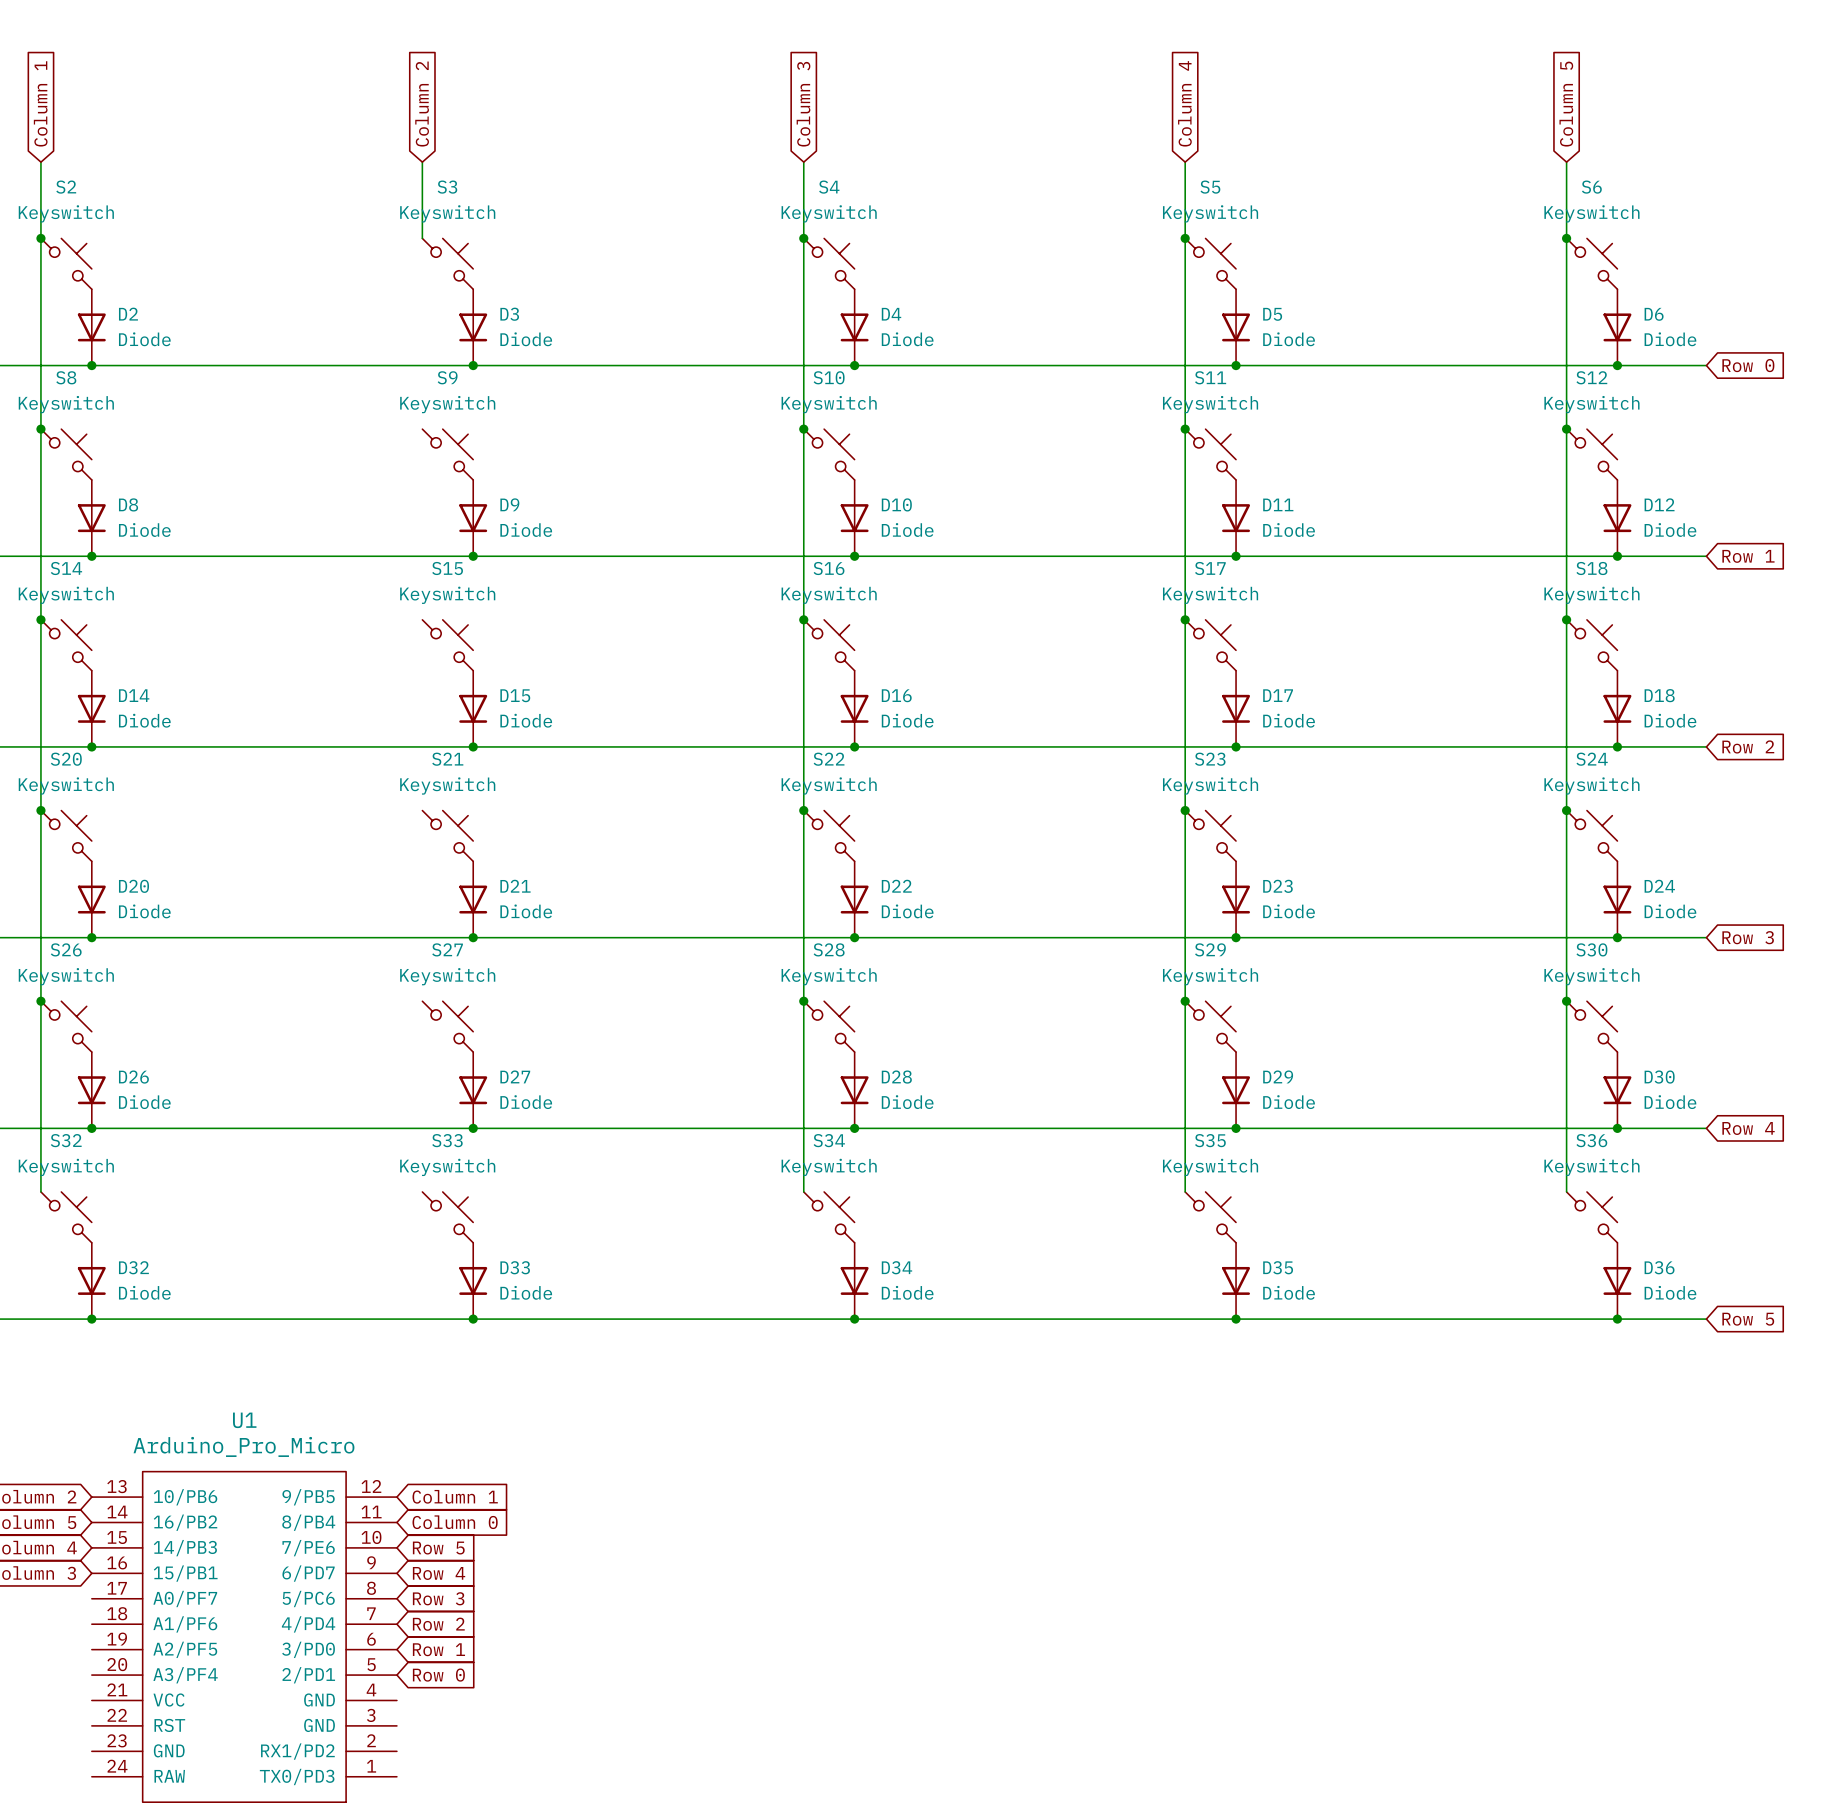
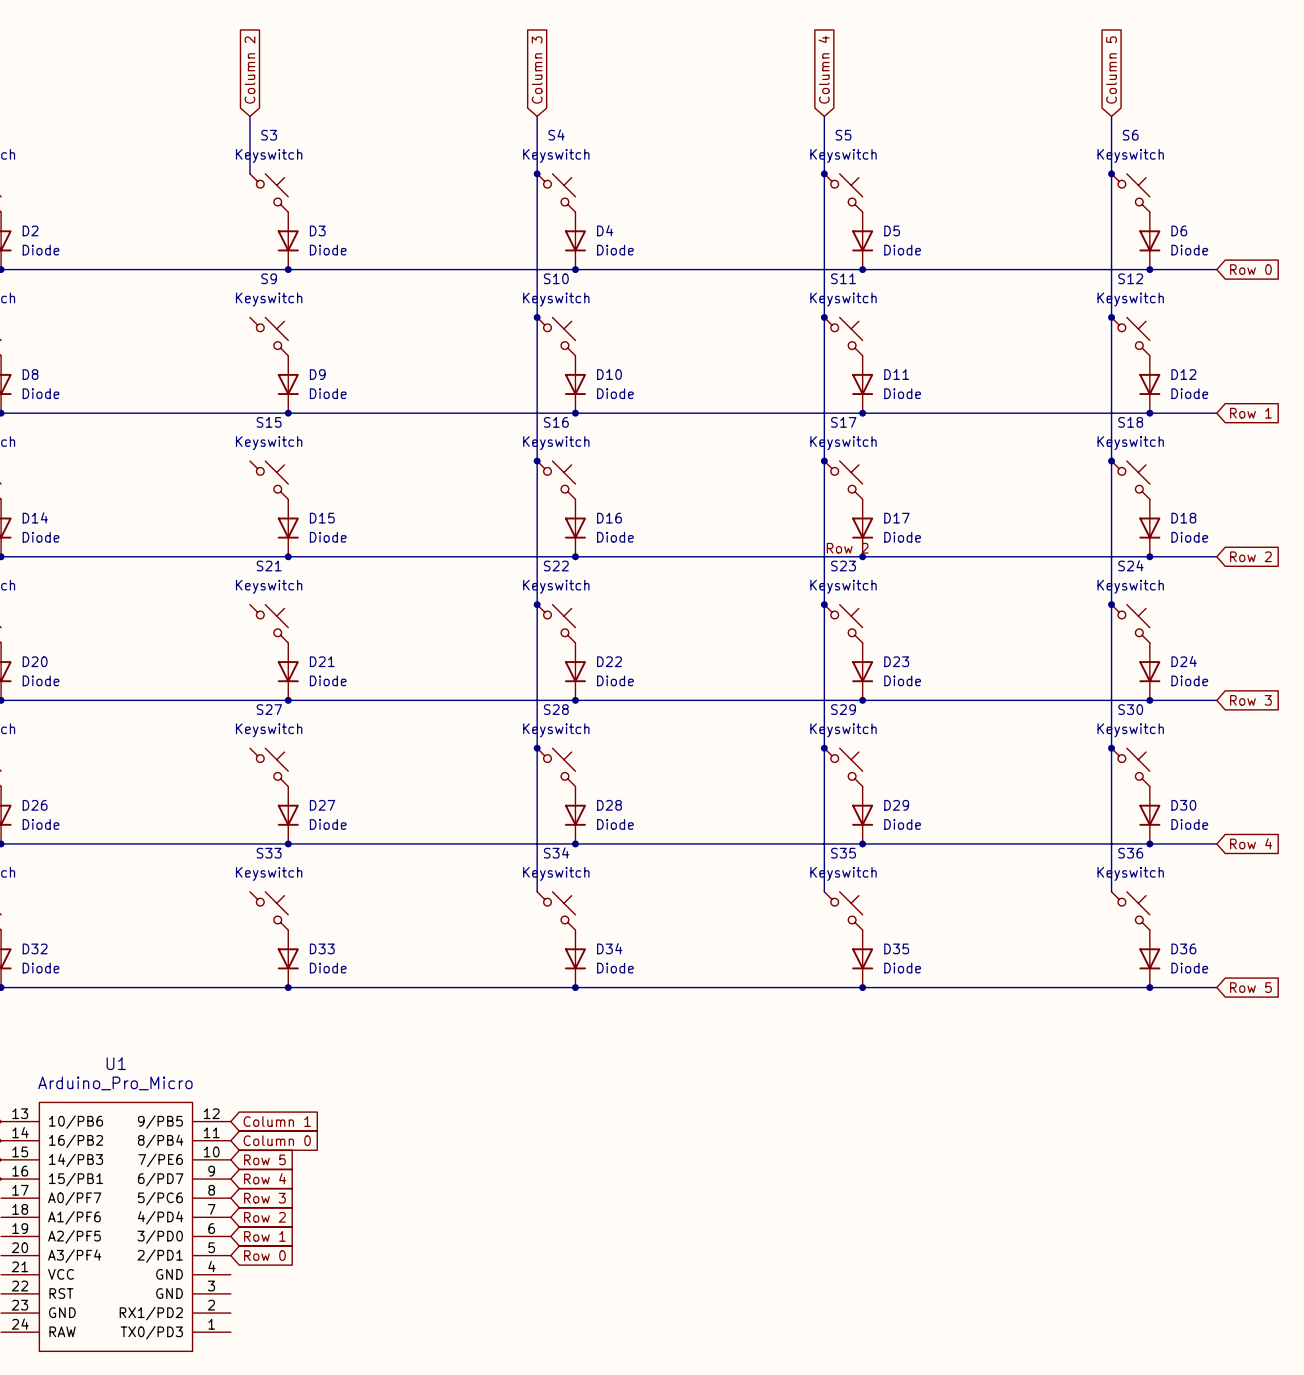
label: none -> Row 2 (847, 548)

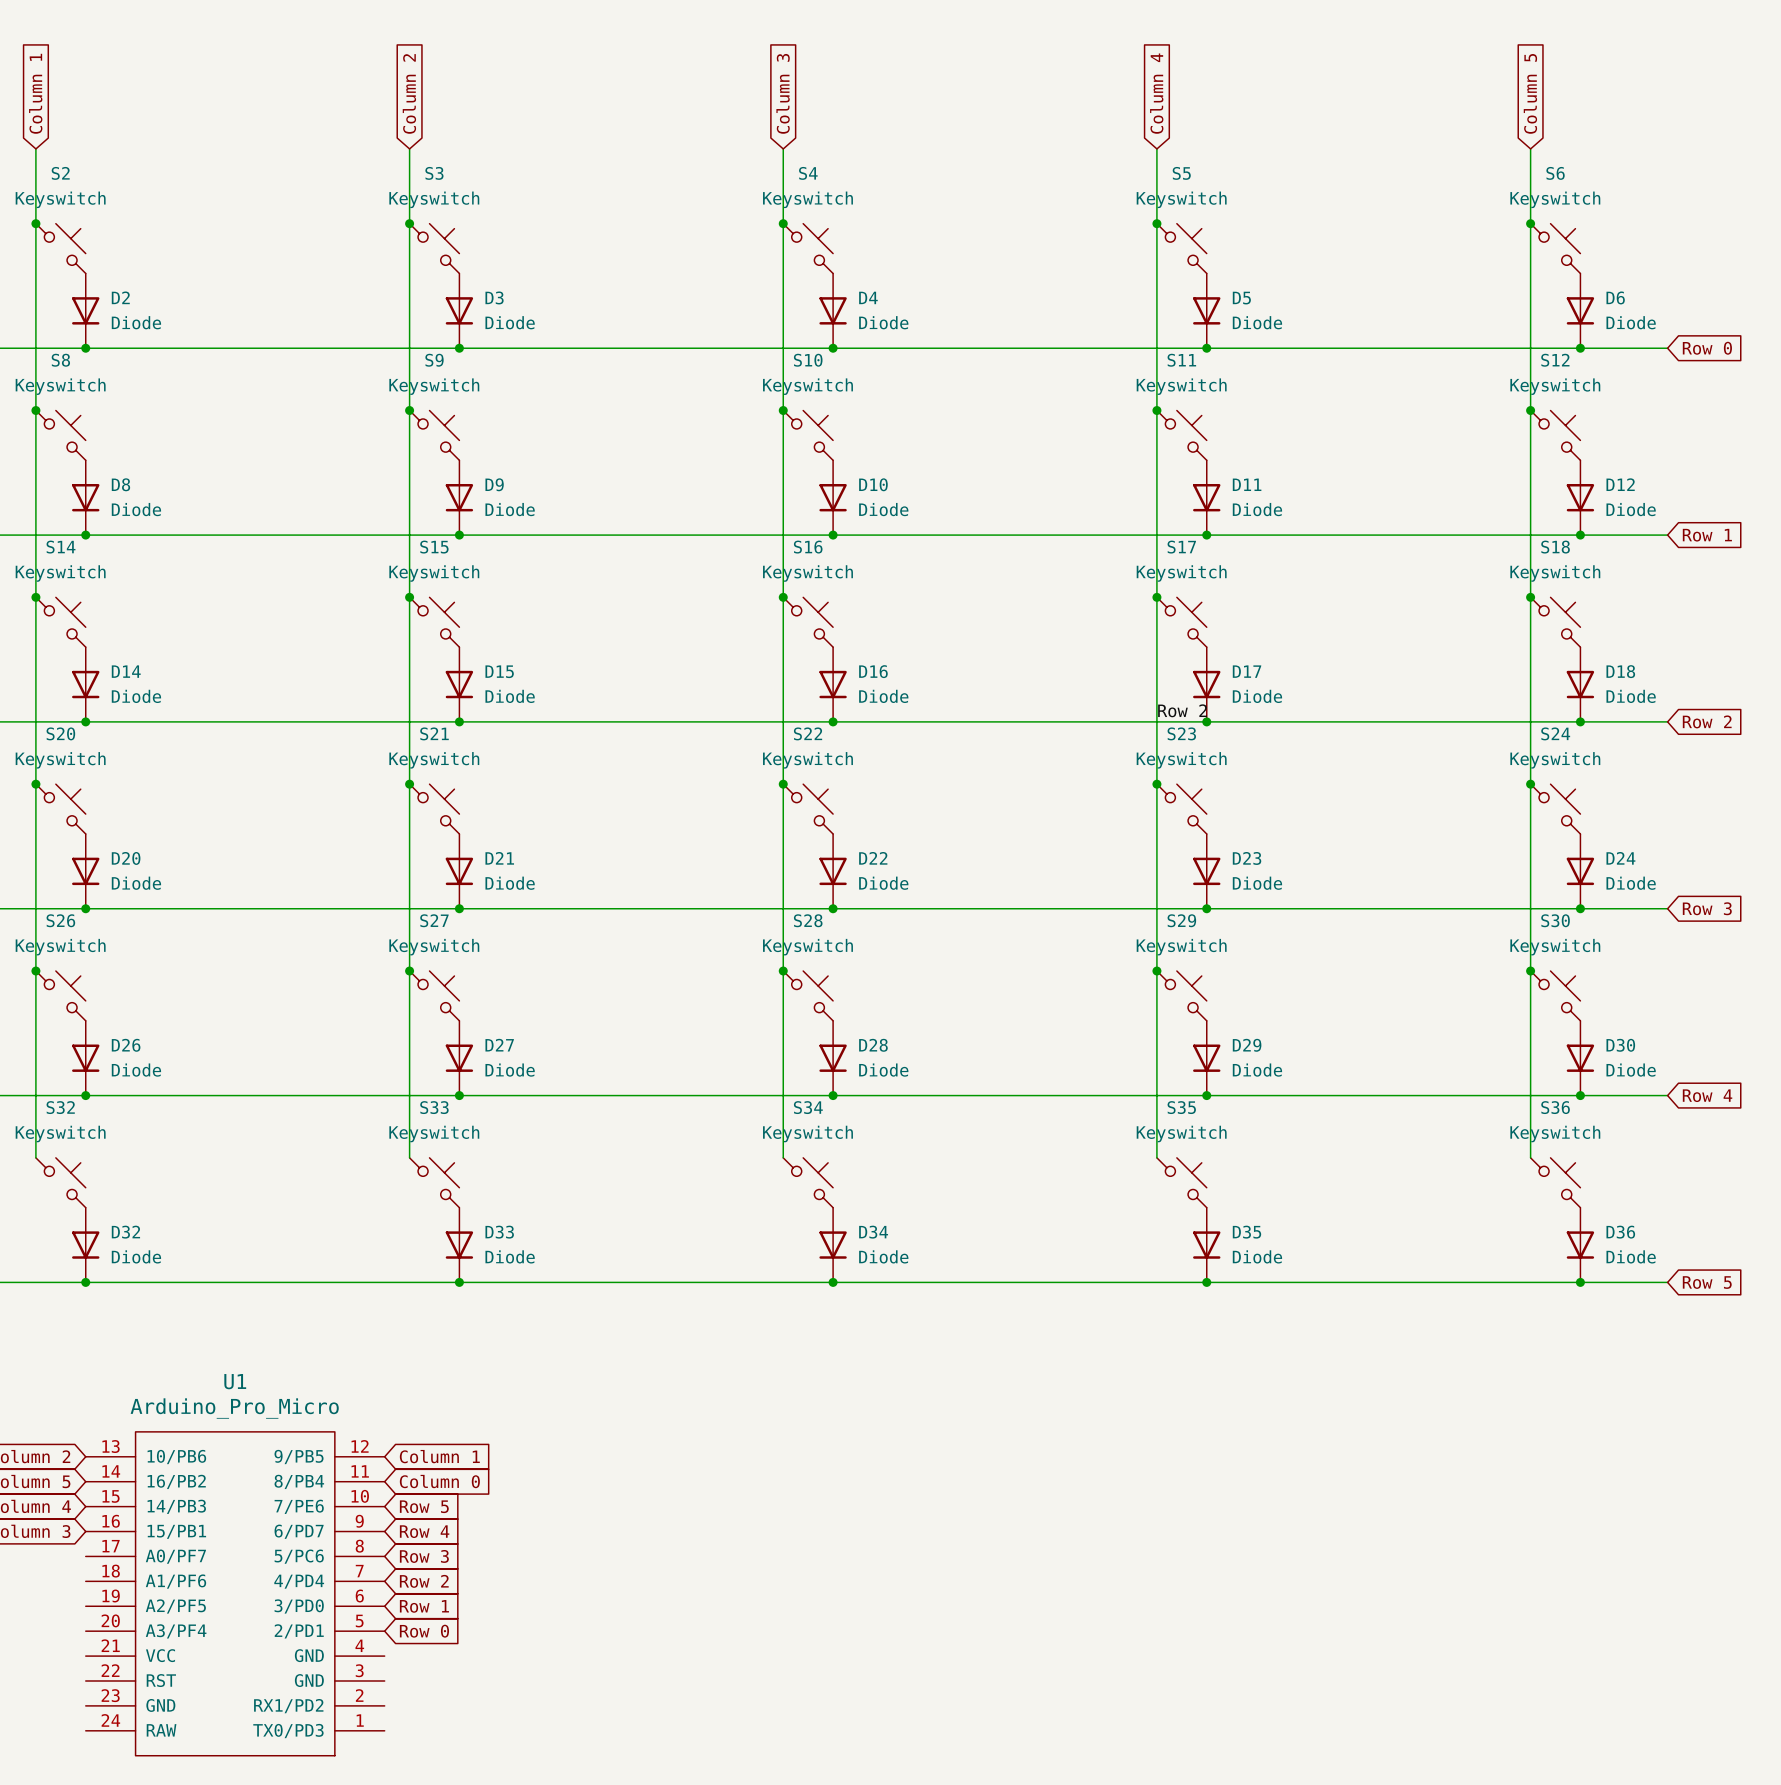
wire: none -> (409, 223) (409, 1157)
junction: none -> (409, 223)
junction: none -> (409, 410)
junction: none -> (409, 597)
junction: none -> (409, 784)
junction: none -> (409, 971)

